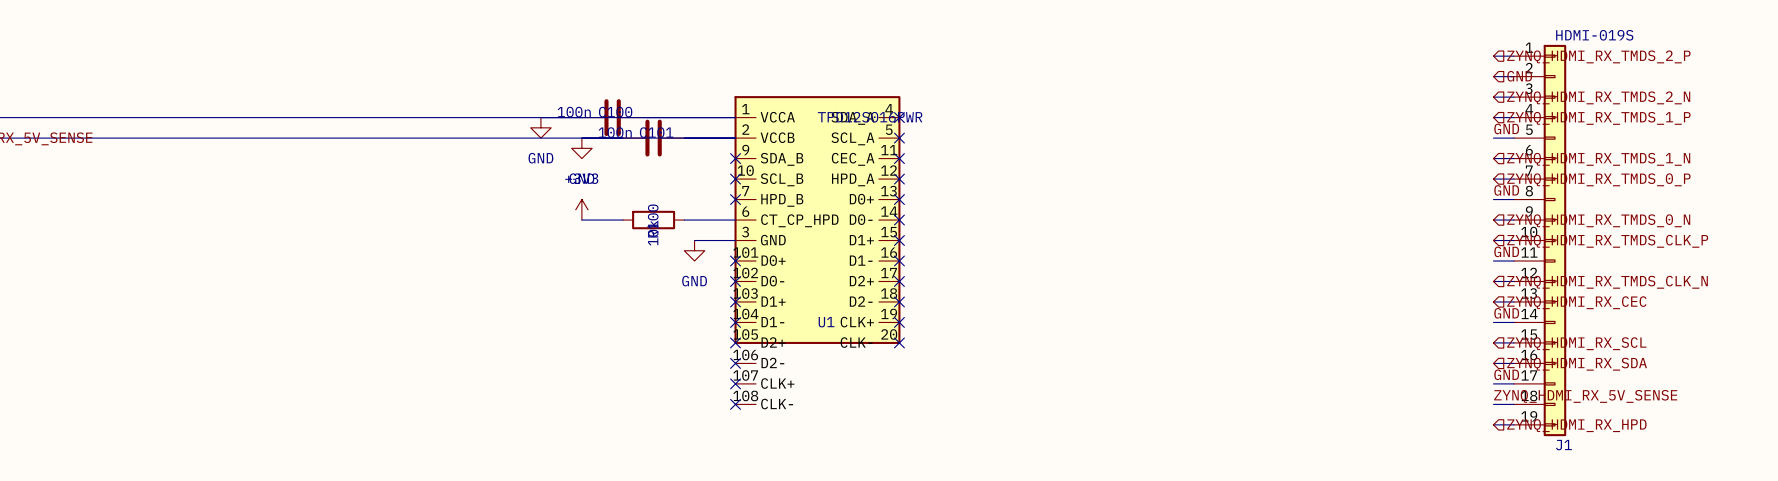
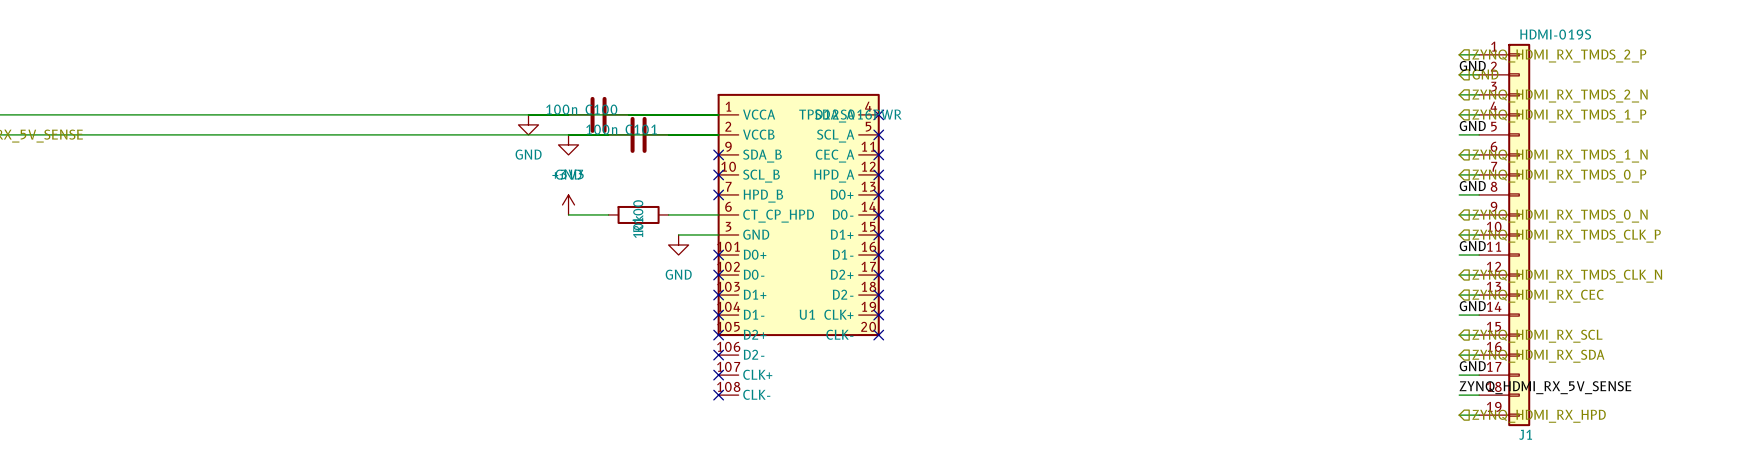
label: none -> GND (1472, 66)

